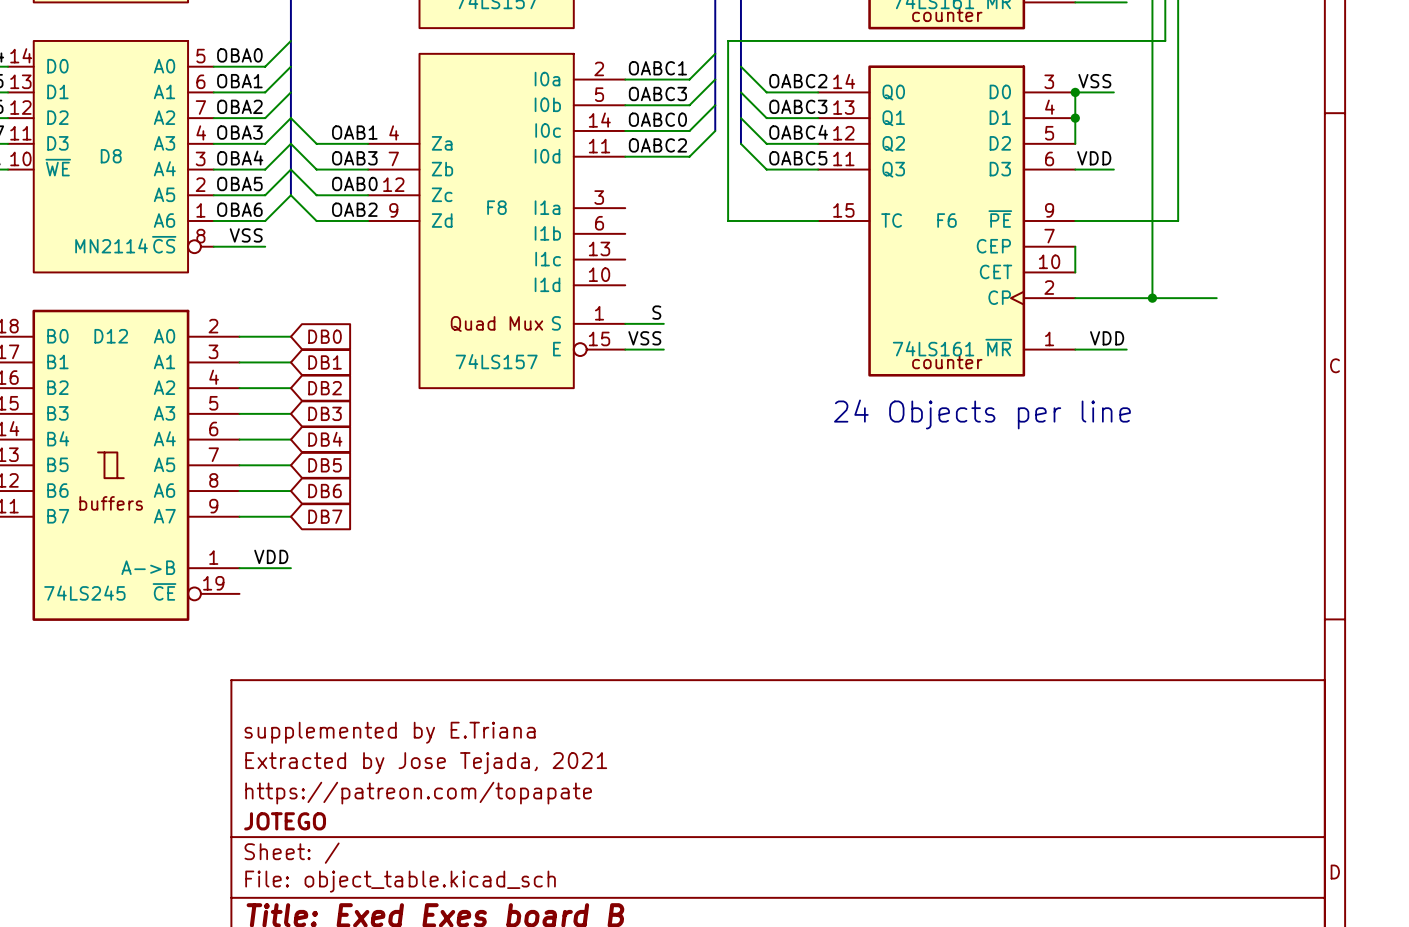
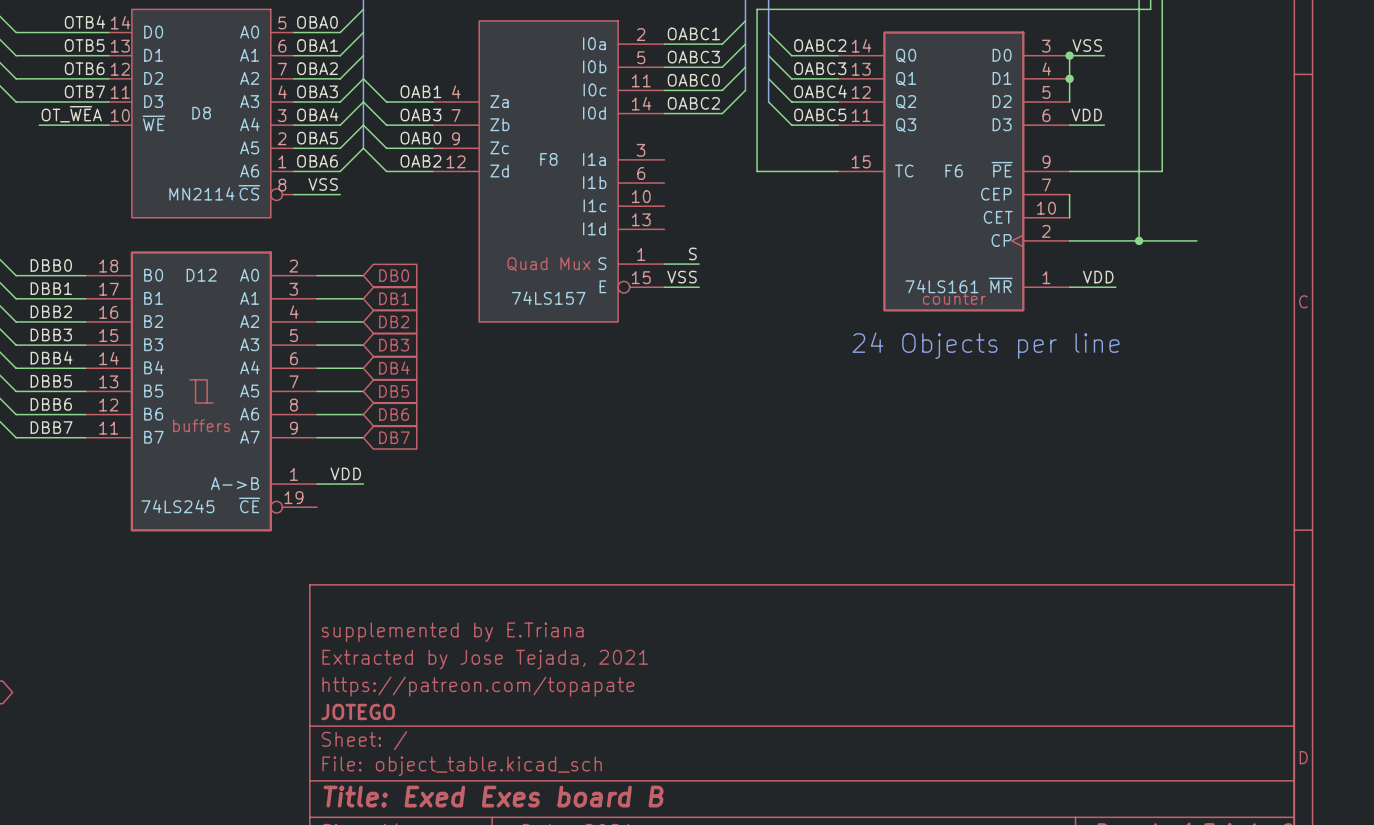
F8 pin number: 14 (599, 120) -> 11 (641, 80)
F8 pin number: 11 (599, 146) -> 14 (641, 103)
F8 pin number: 12 (393, 184) -> 9 (456, 138)
F8 pin number: 9 (393, 210) -> 12 (456, 161)
F8 pin number: 13 (599, 248) -> 10 (641, 196)
F8 pin number: 10 (599, 274) -> 13 (641, 219)

